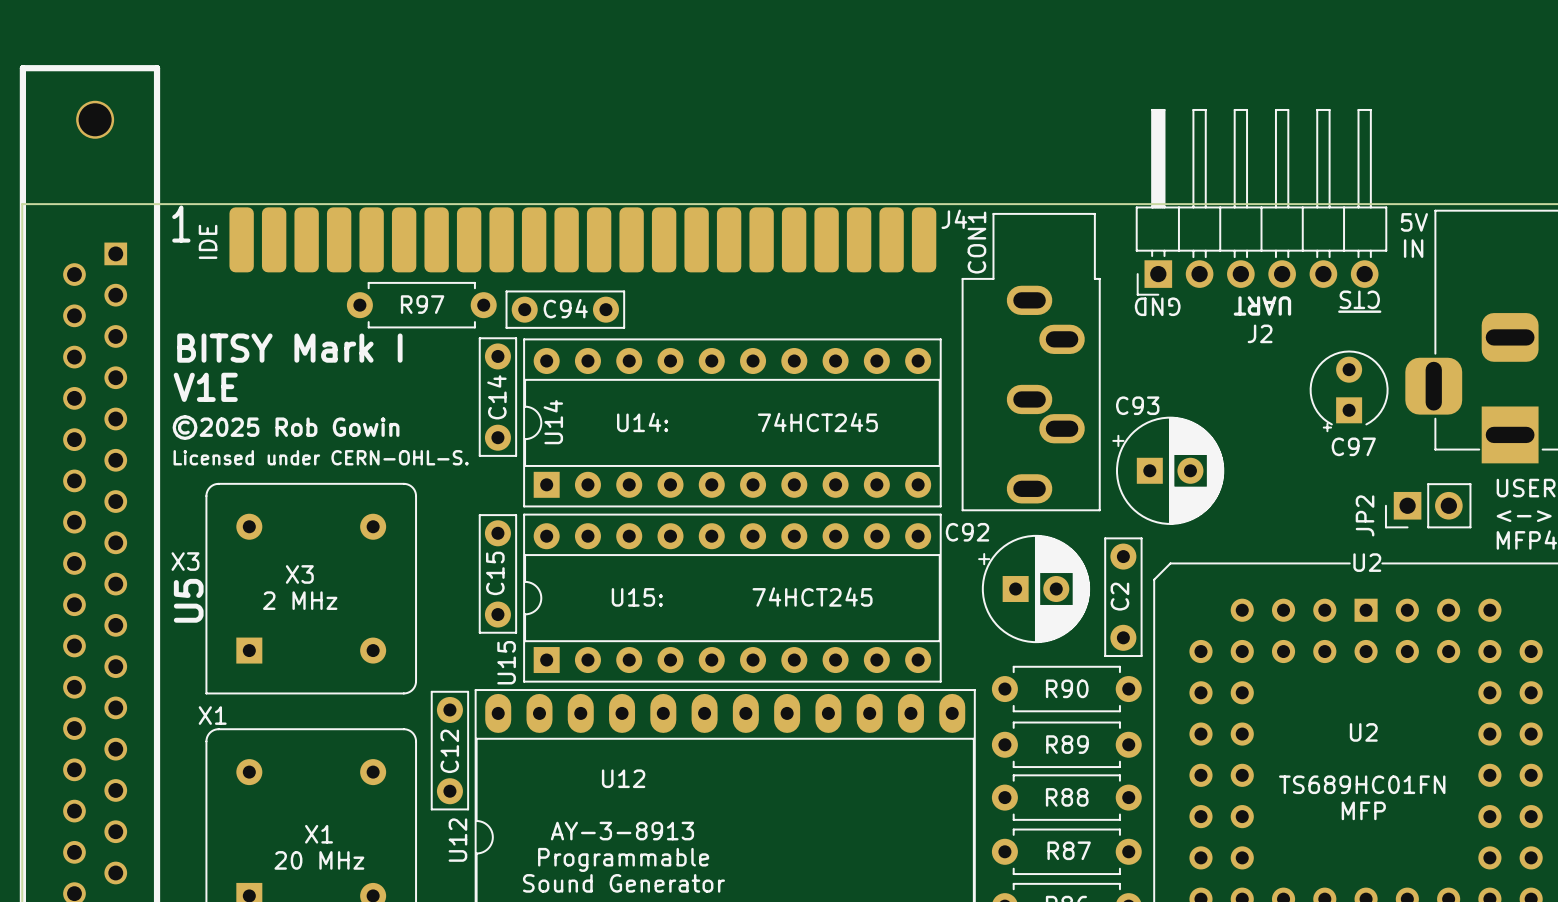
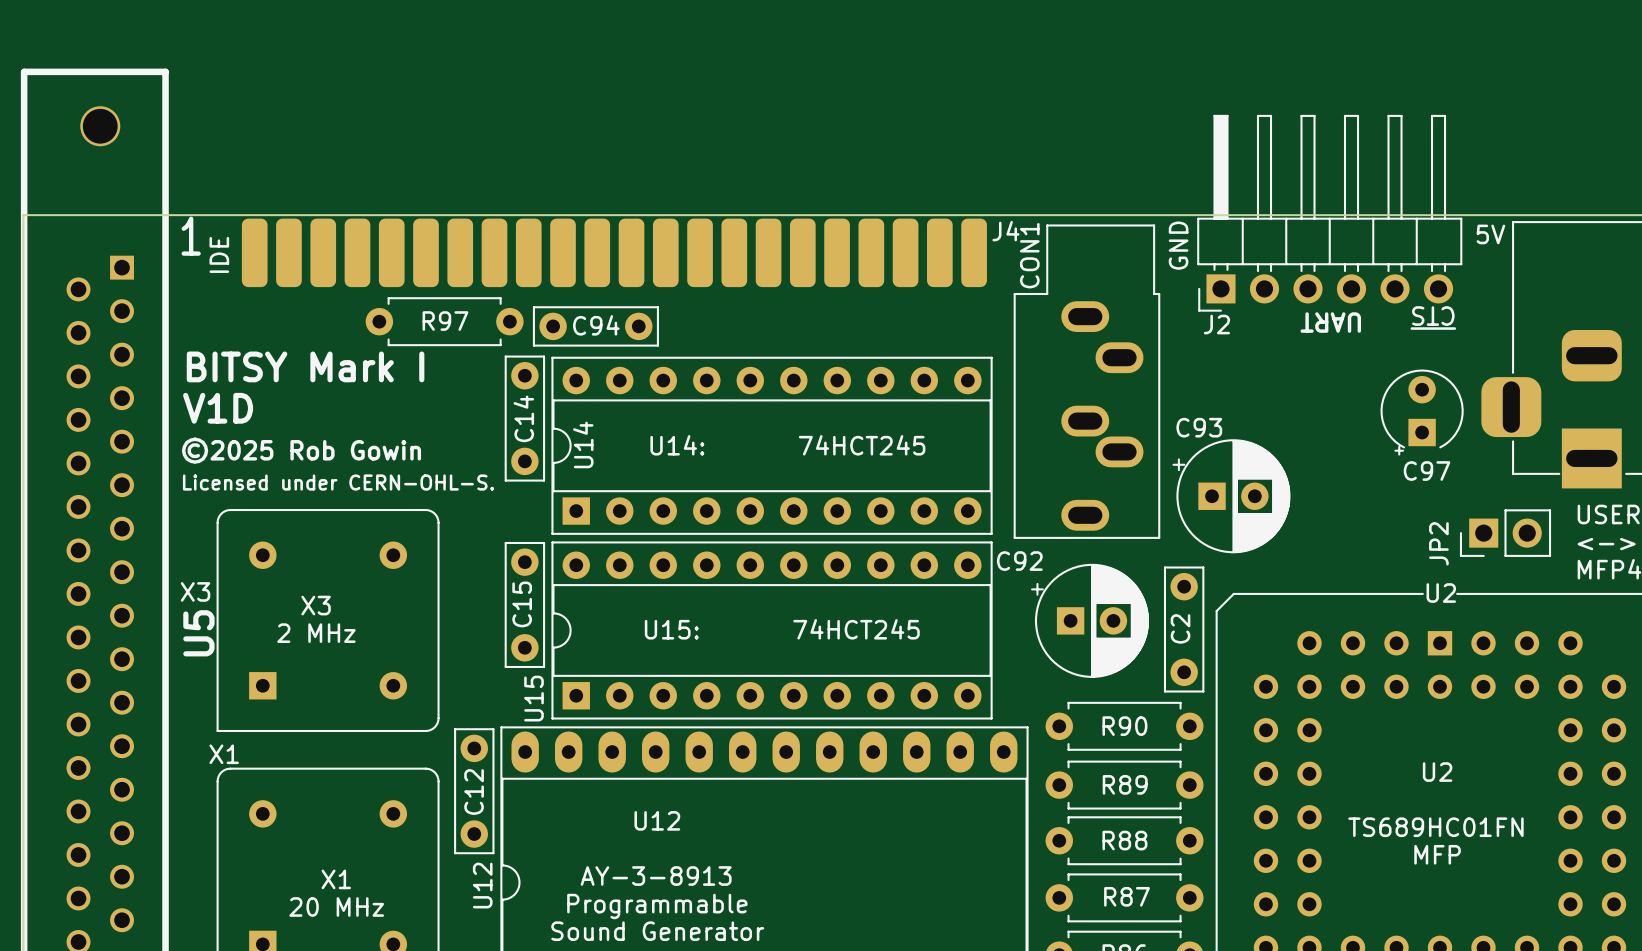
text: IN (1413, 248) -> none
text rotation: 0° (1157, 306) -> 90° clockwise (1178, 245)
text position: GND (1157, 306) -> GND (1178, 245)
J2 name position: J2 (1260, 333) -> J2 (1216, 324)
text: V1E (205, 387) -> V1D (218, 408)

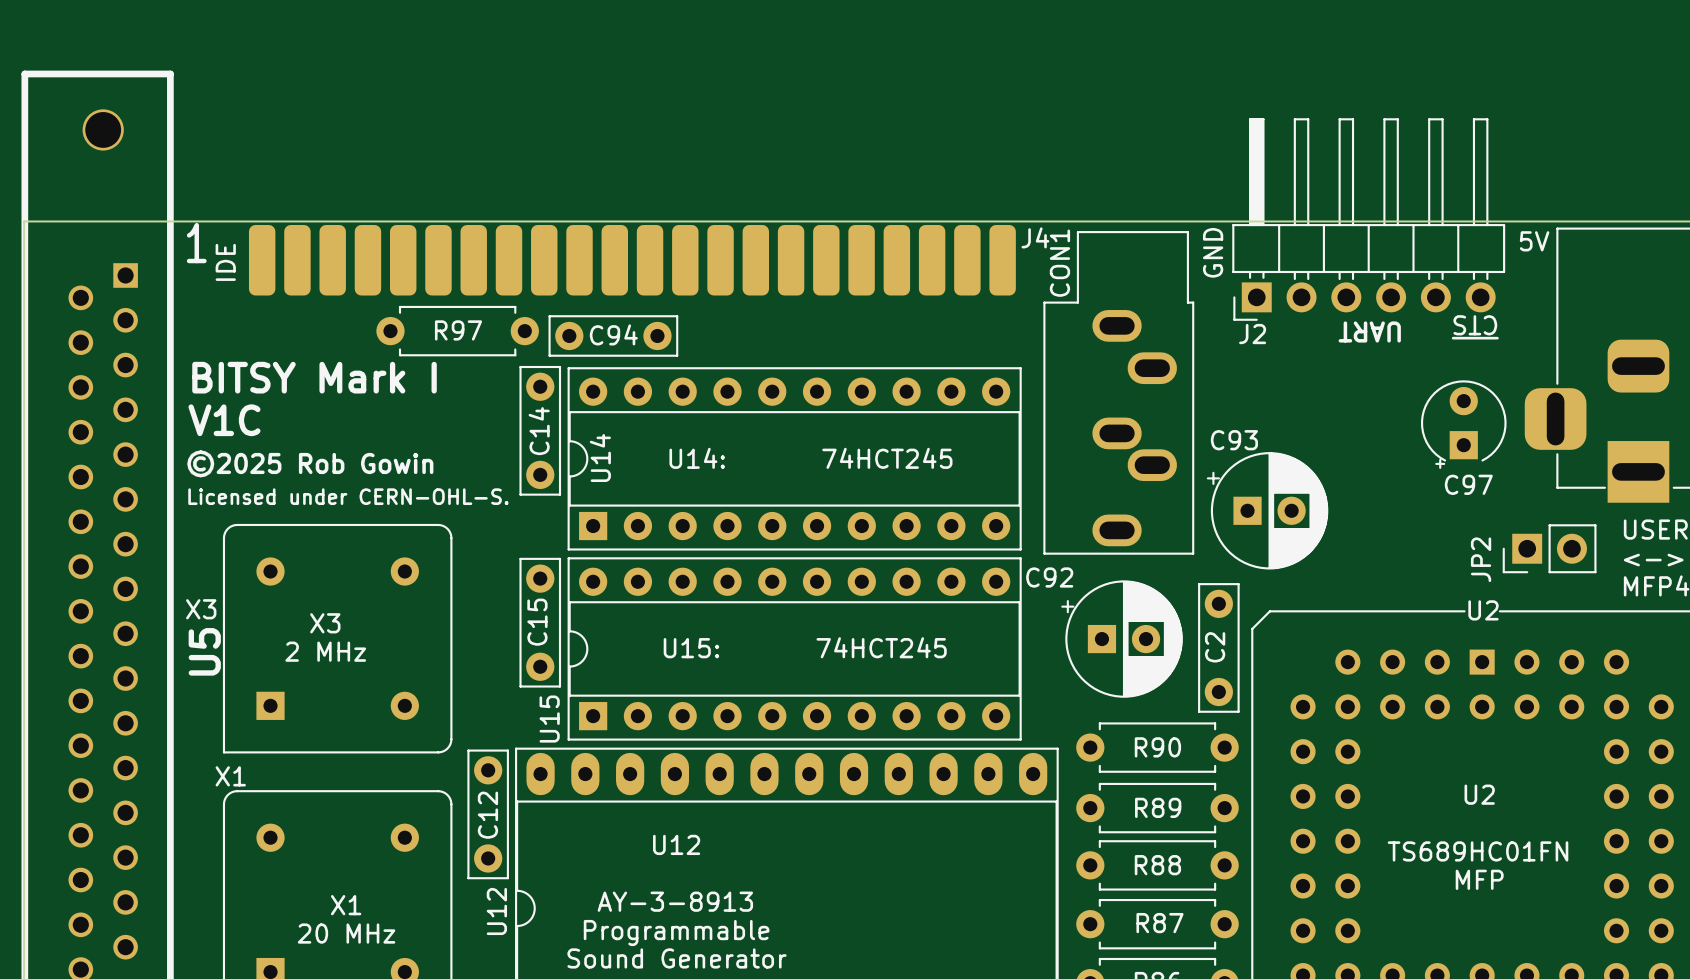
text: V1D (218, 408) -> V1C (224, 420)

